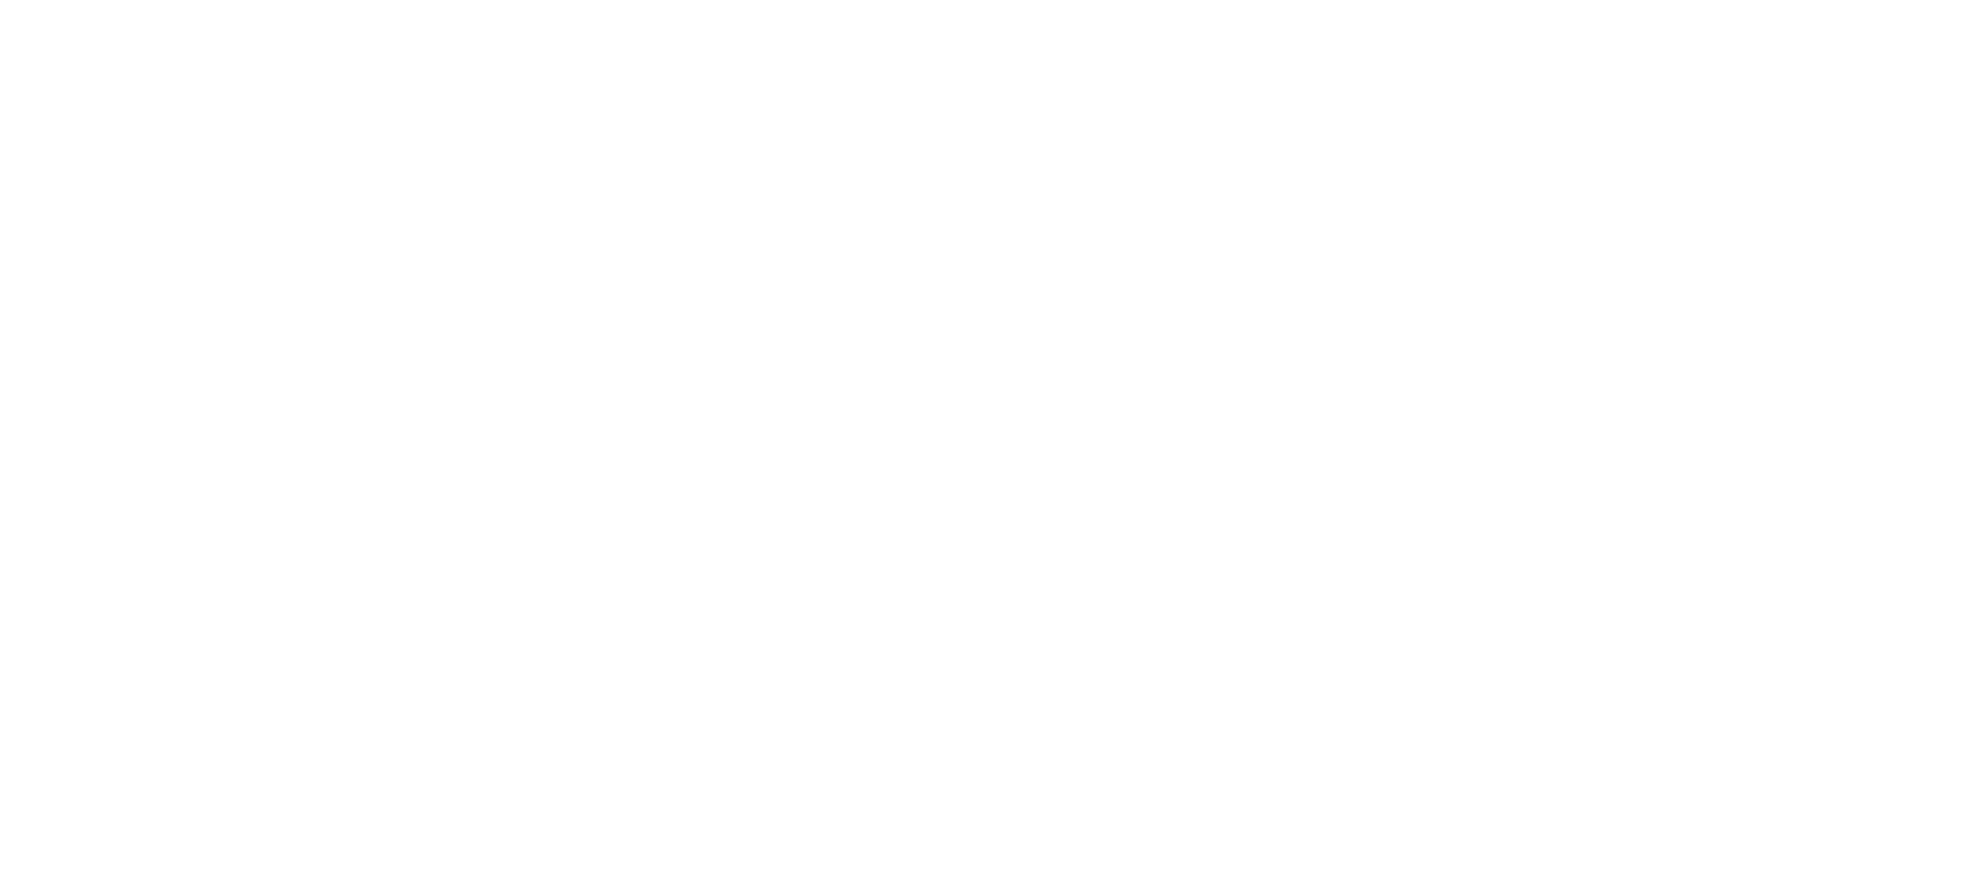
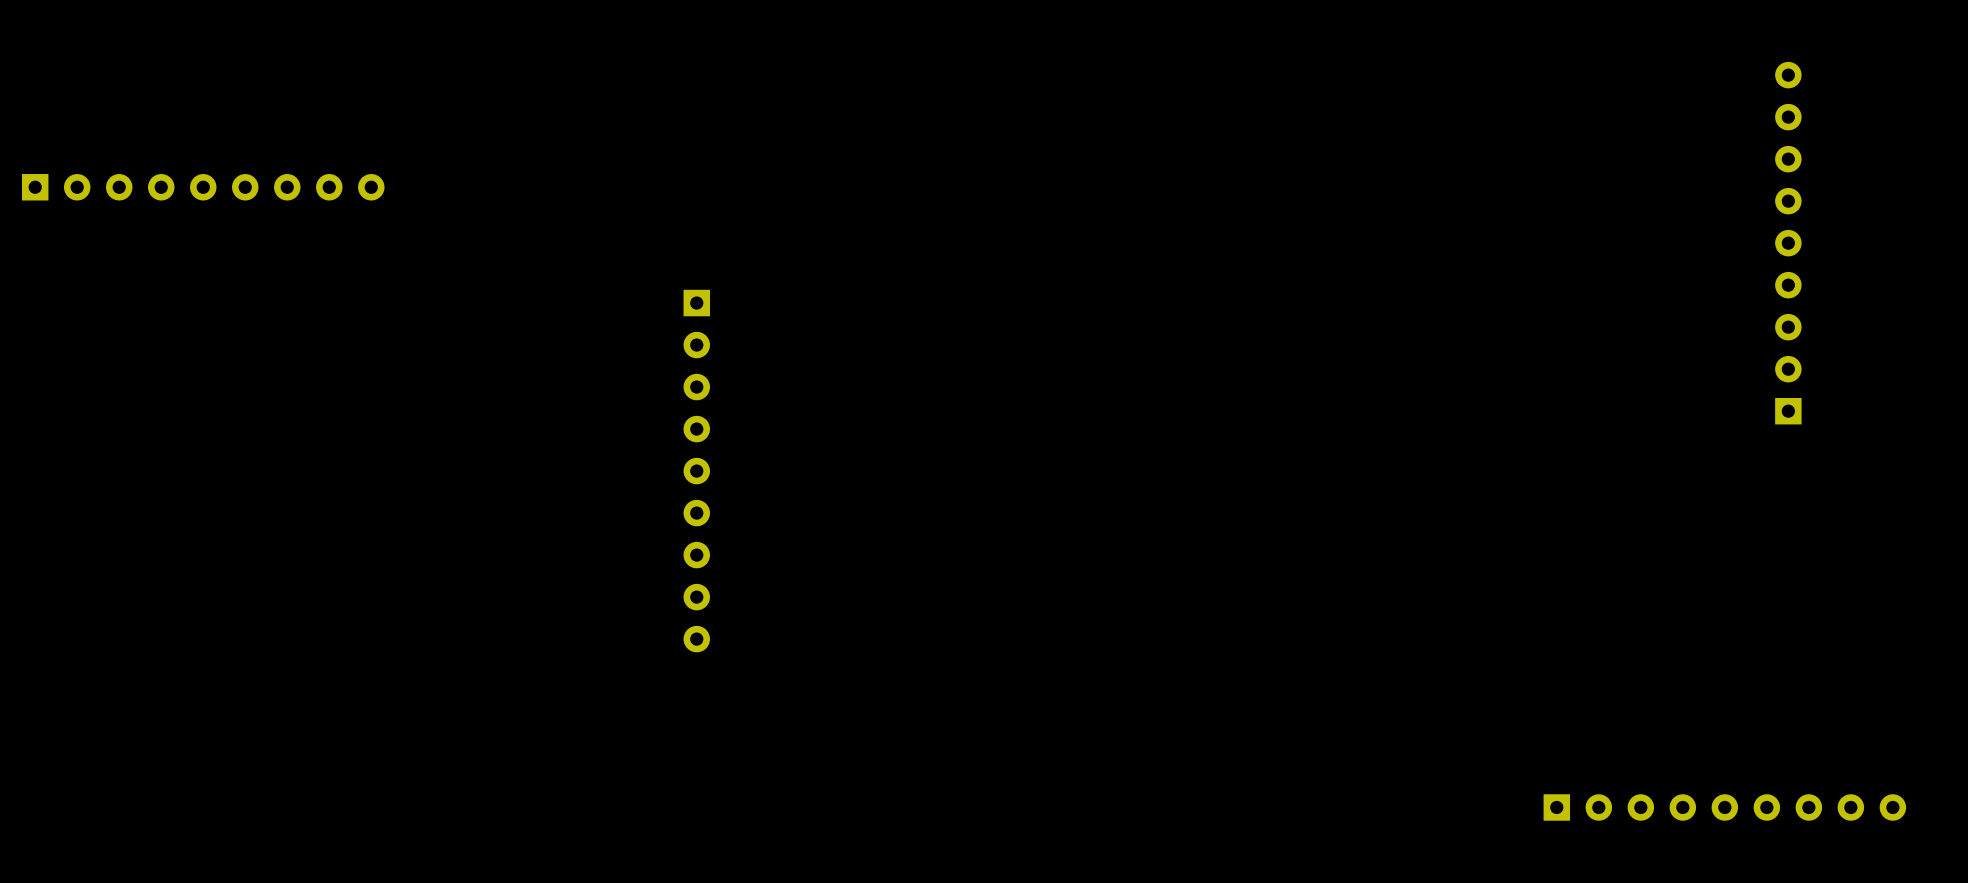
part: none -> (203, 187)
part: none -> (1788, 243)
part: none -> (696, 471)
part: none -> (1724, 807)

